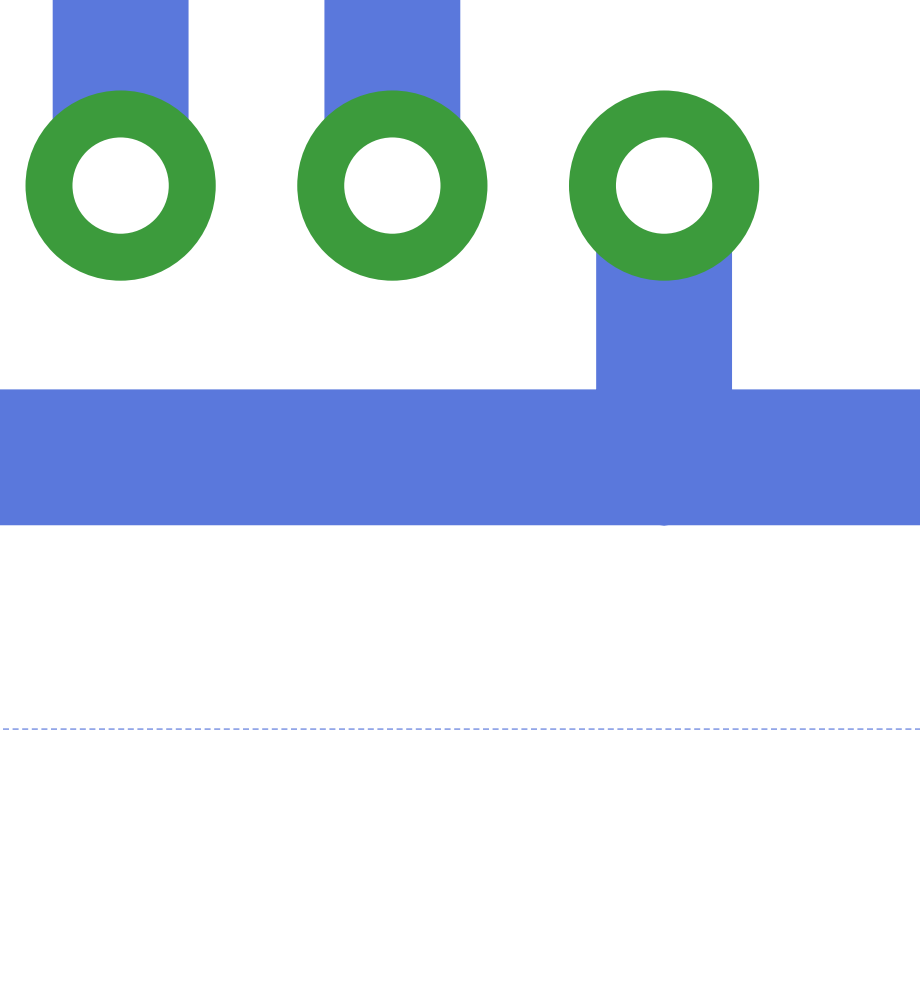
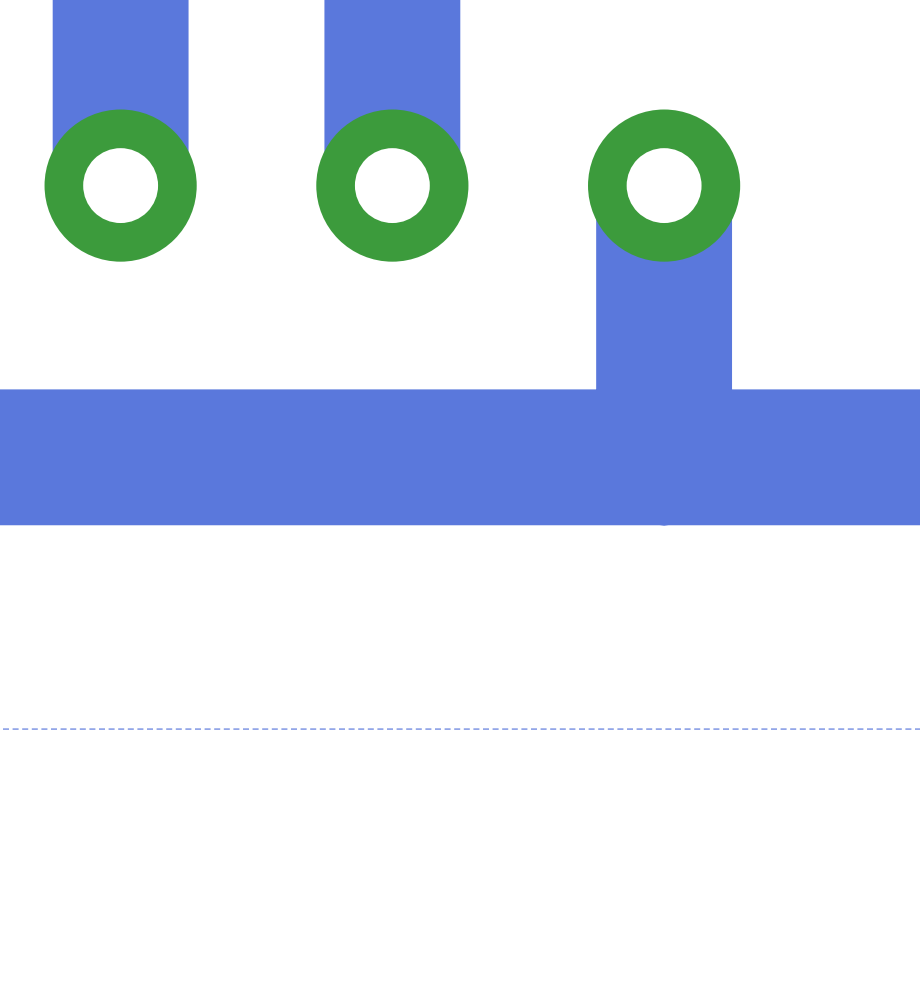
part footprint: [25, 90, 760, 281] -> [44, 109, 741, 262]

